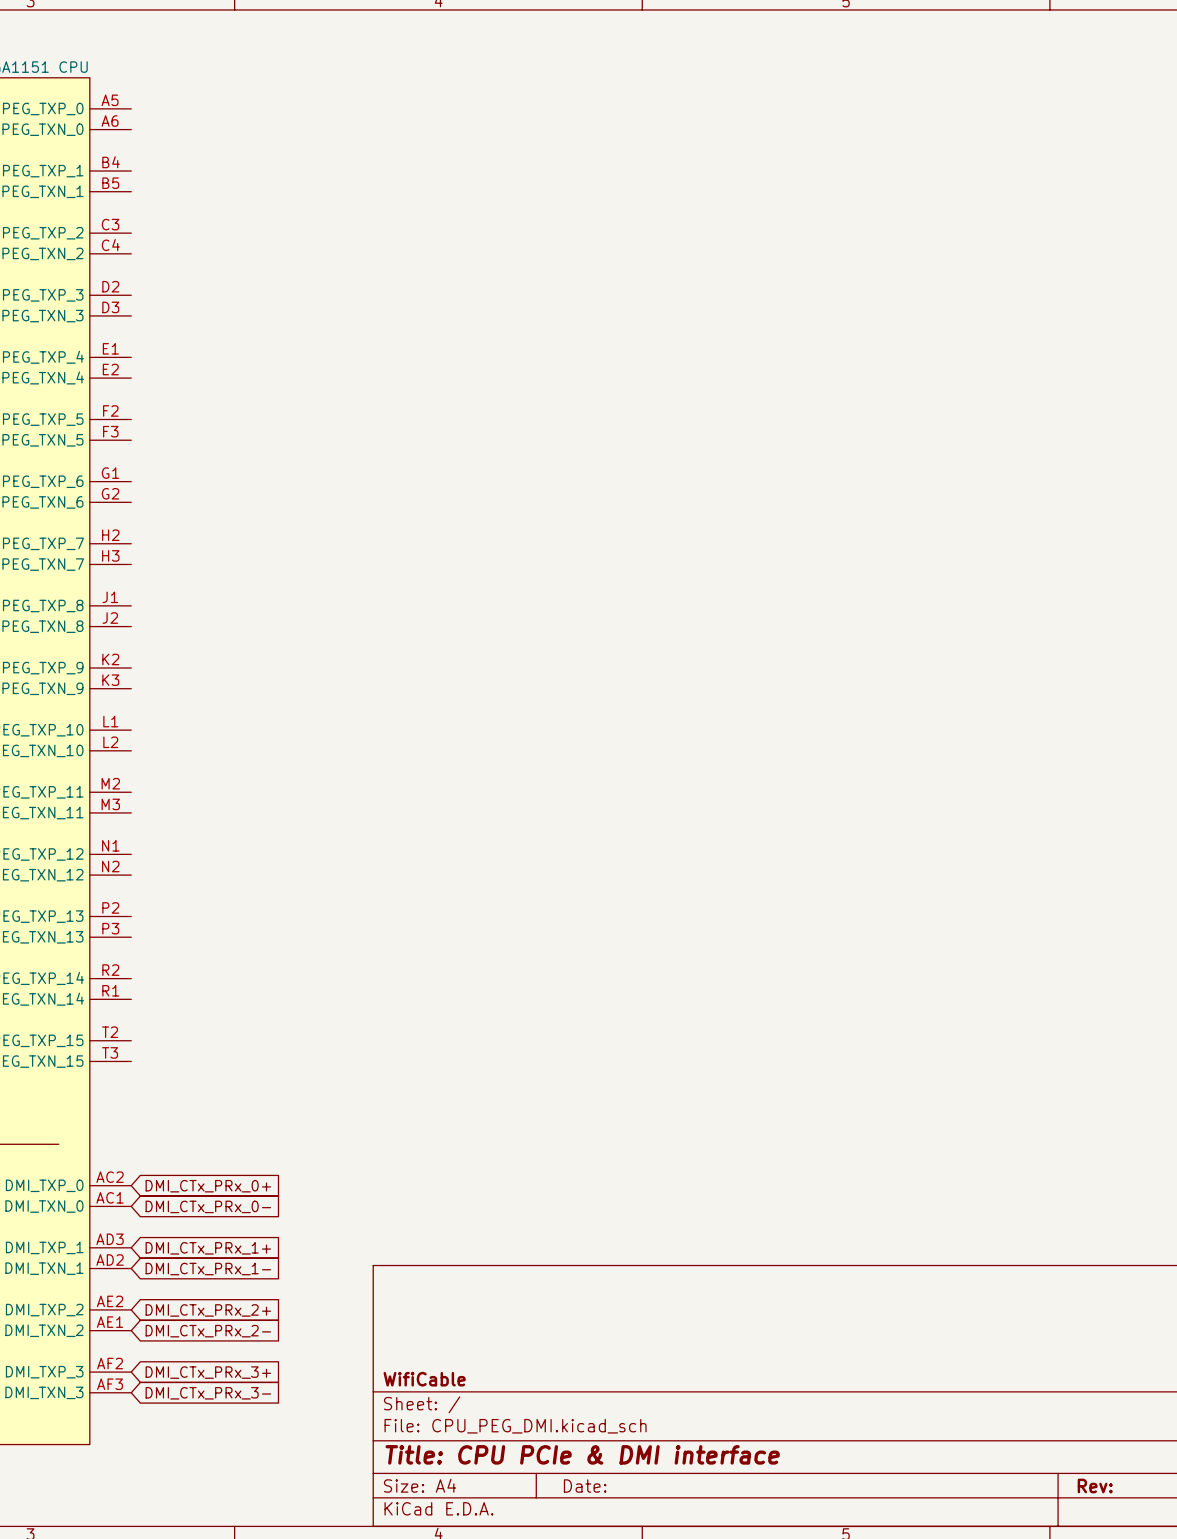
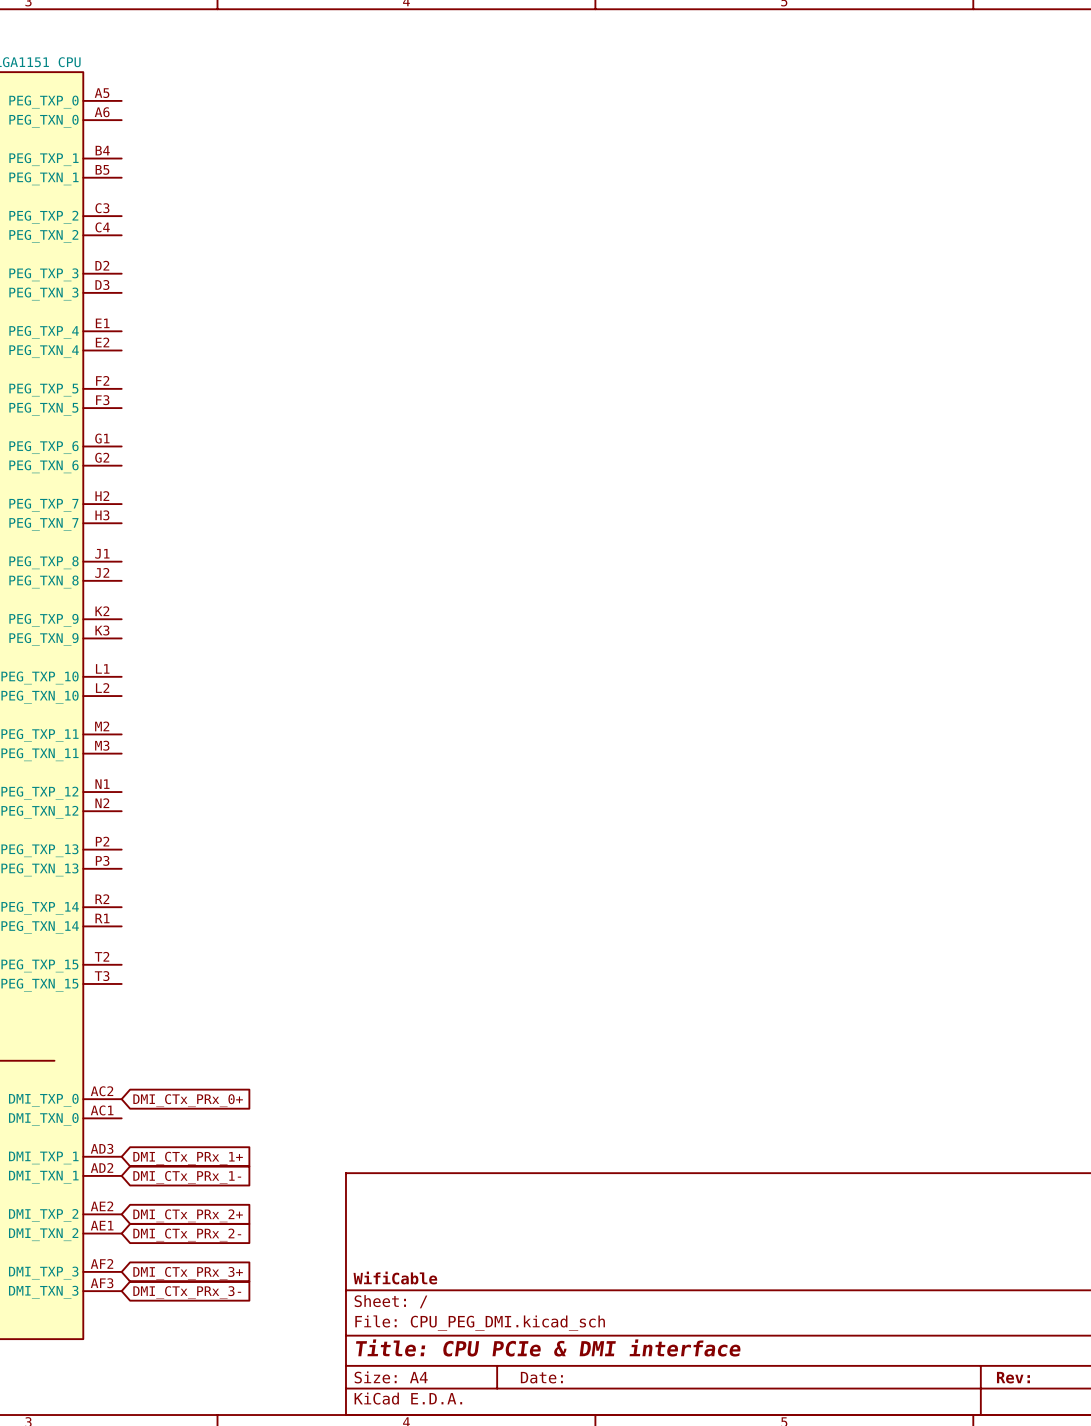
global label: DMI_CTx_PRx_0- (208, 1206) -> none

